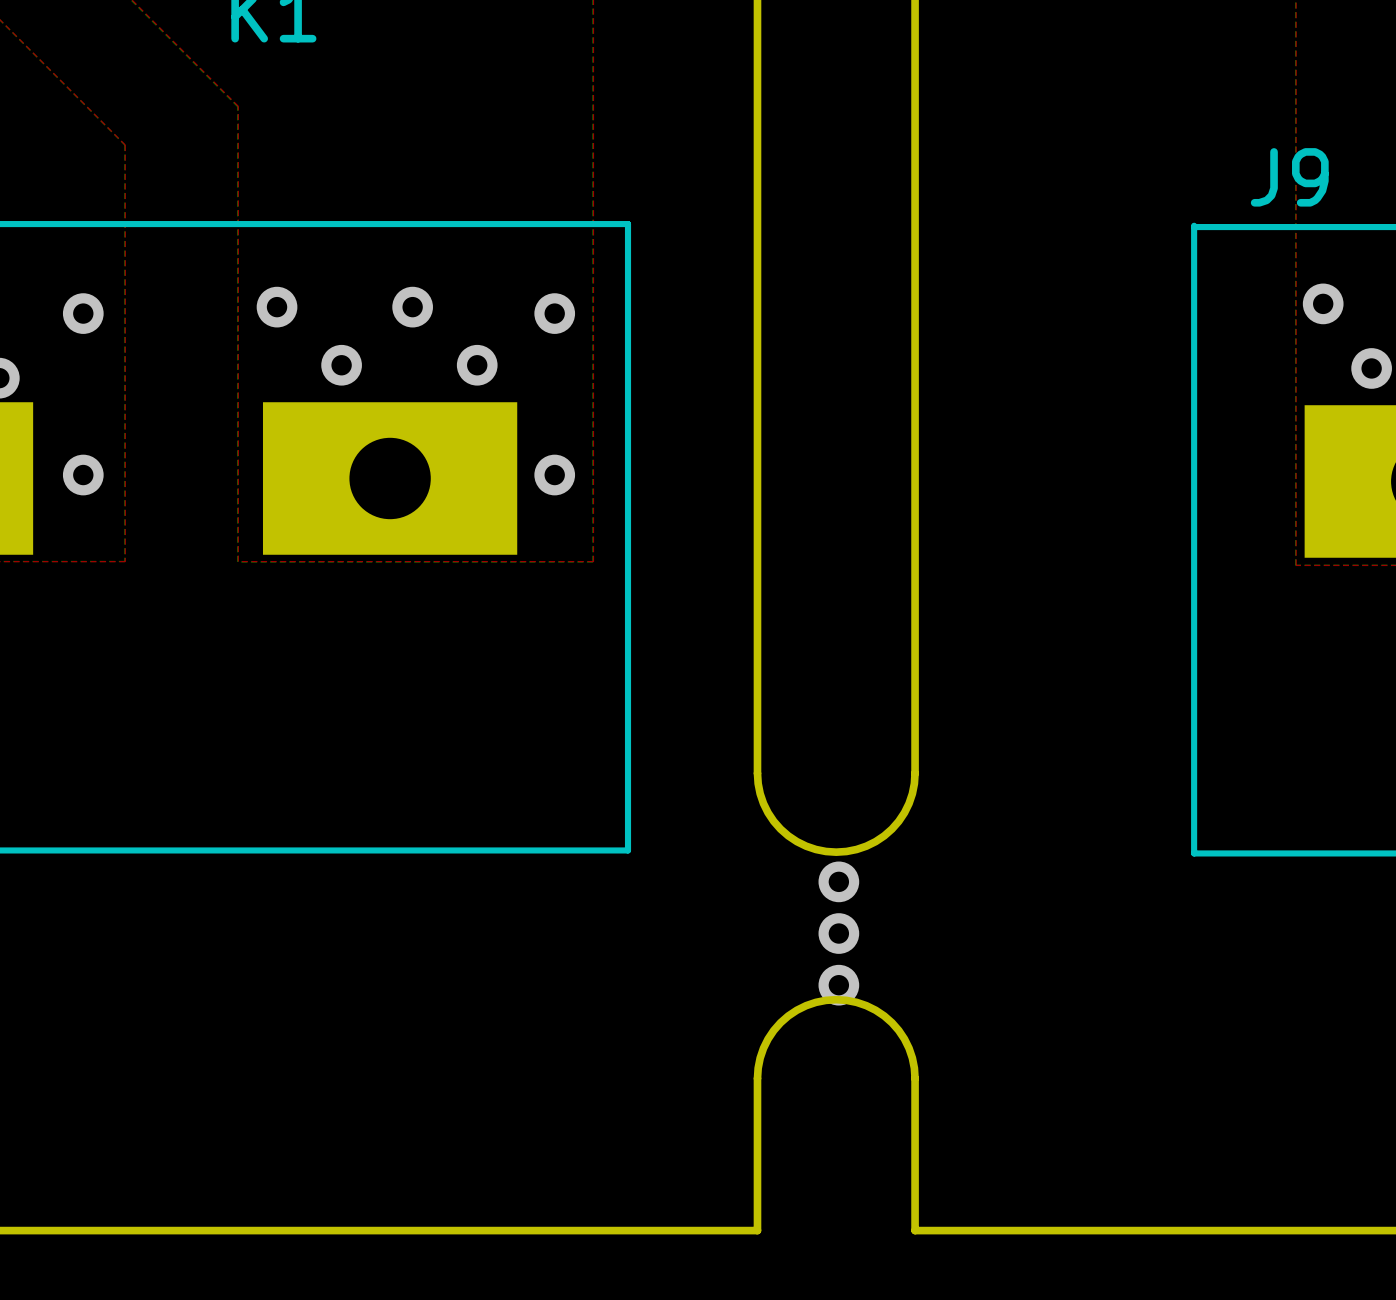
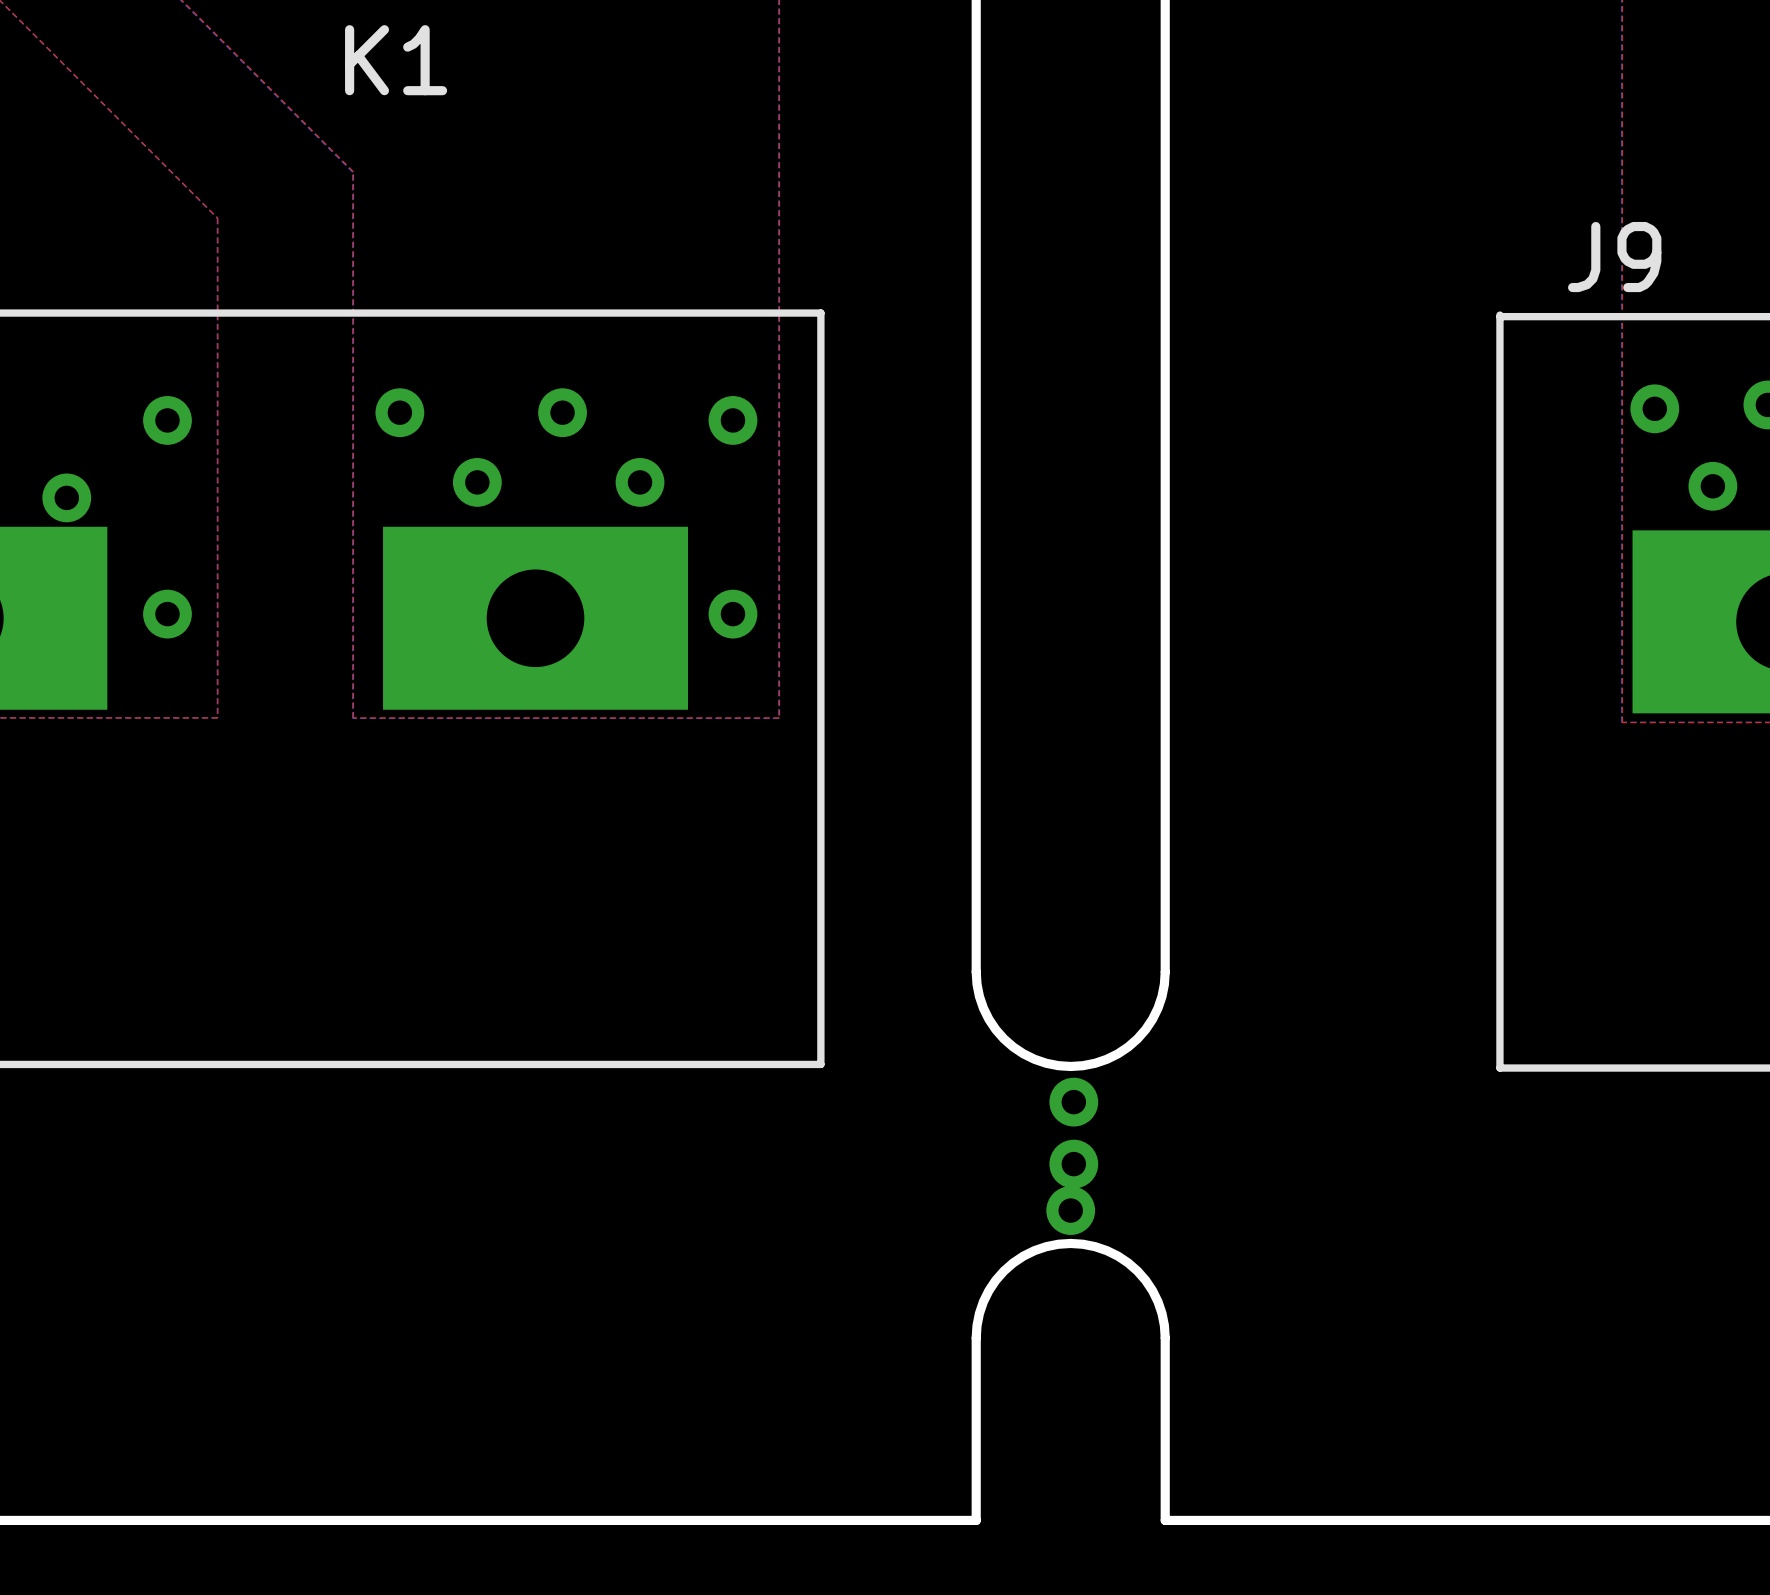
via position: (838, 985) -> (1070, 1210)

